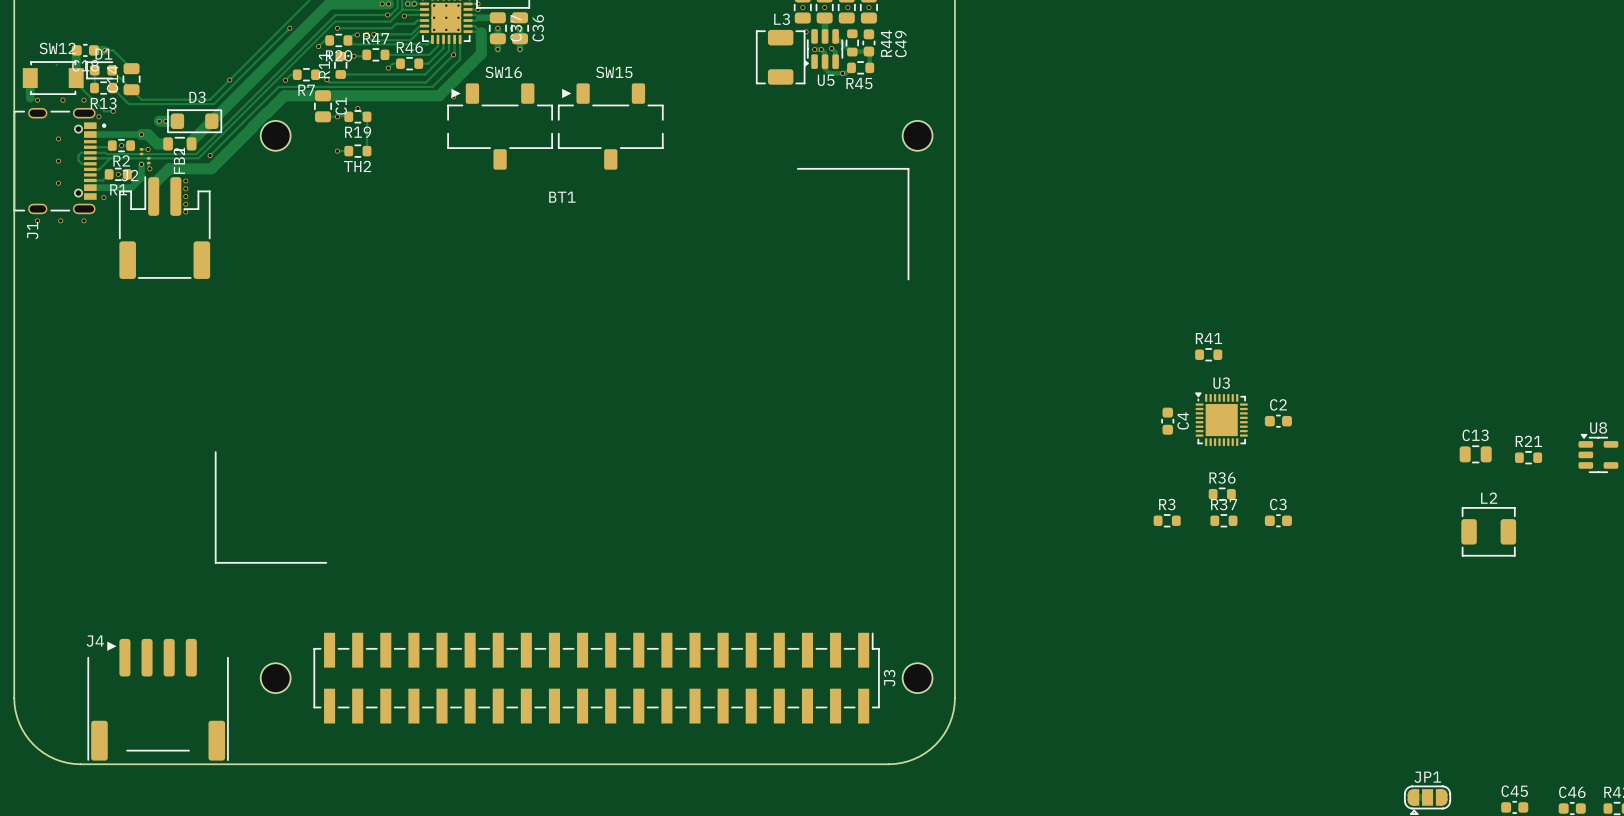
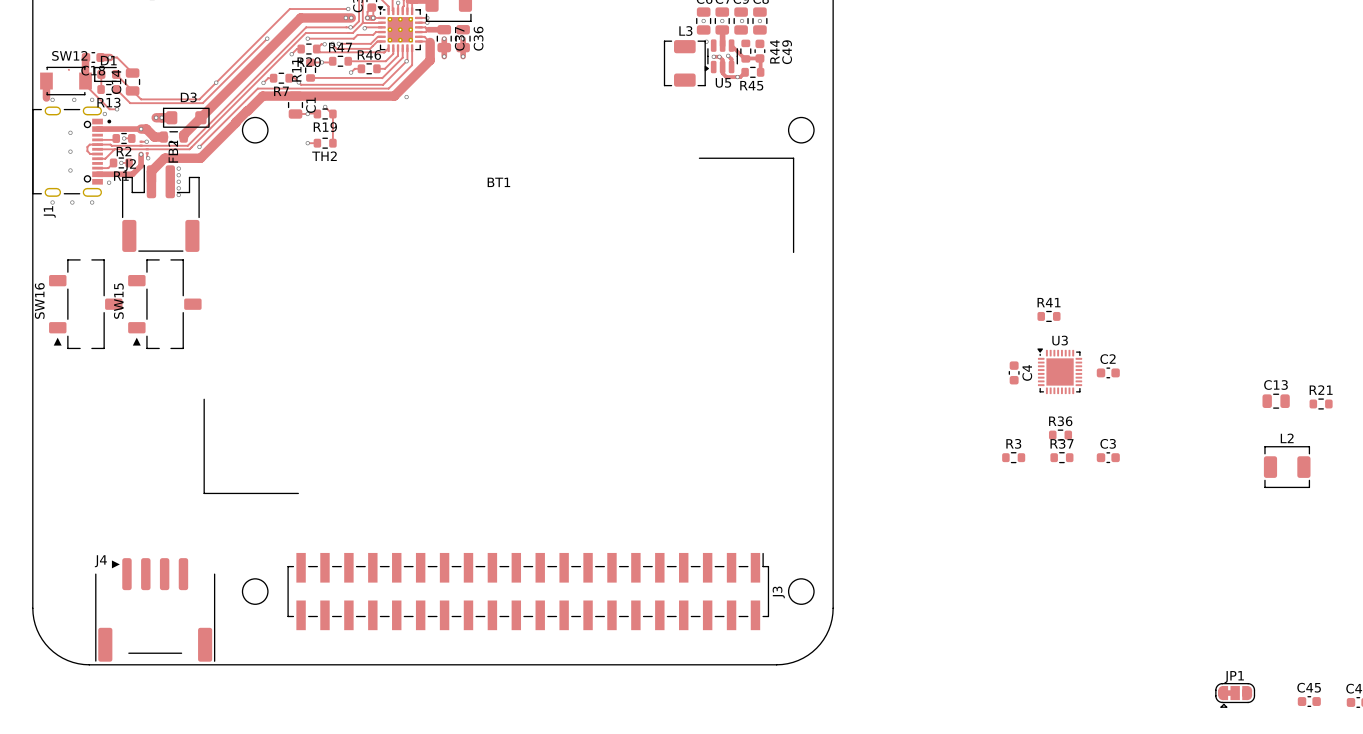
SW16 rotation: 0° (500, 126) -> 90° counterclockwise (85, 304)
SW16 position: (500, 126) -> (85, 304)
SW15 rotation: 0° (610, 126) -> 90° counterclockwise (164, 304)
SW15 position: (610, 126) -> (164, 304)

